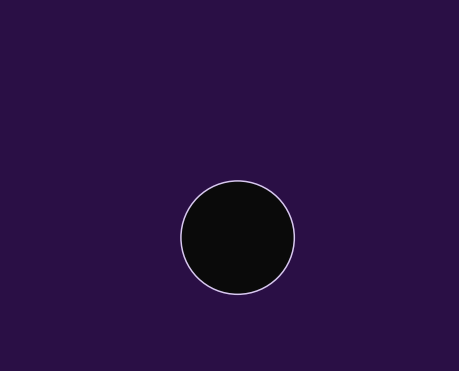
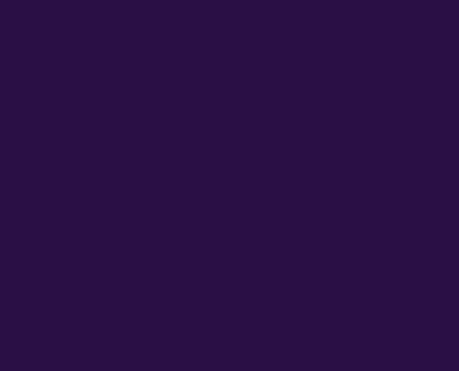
part: (237, 237) -> none

